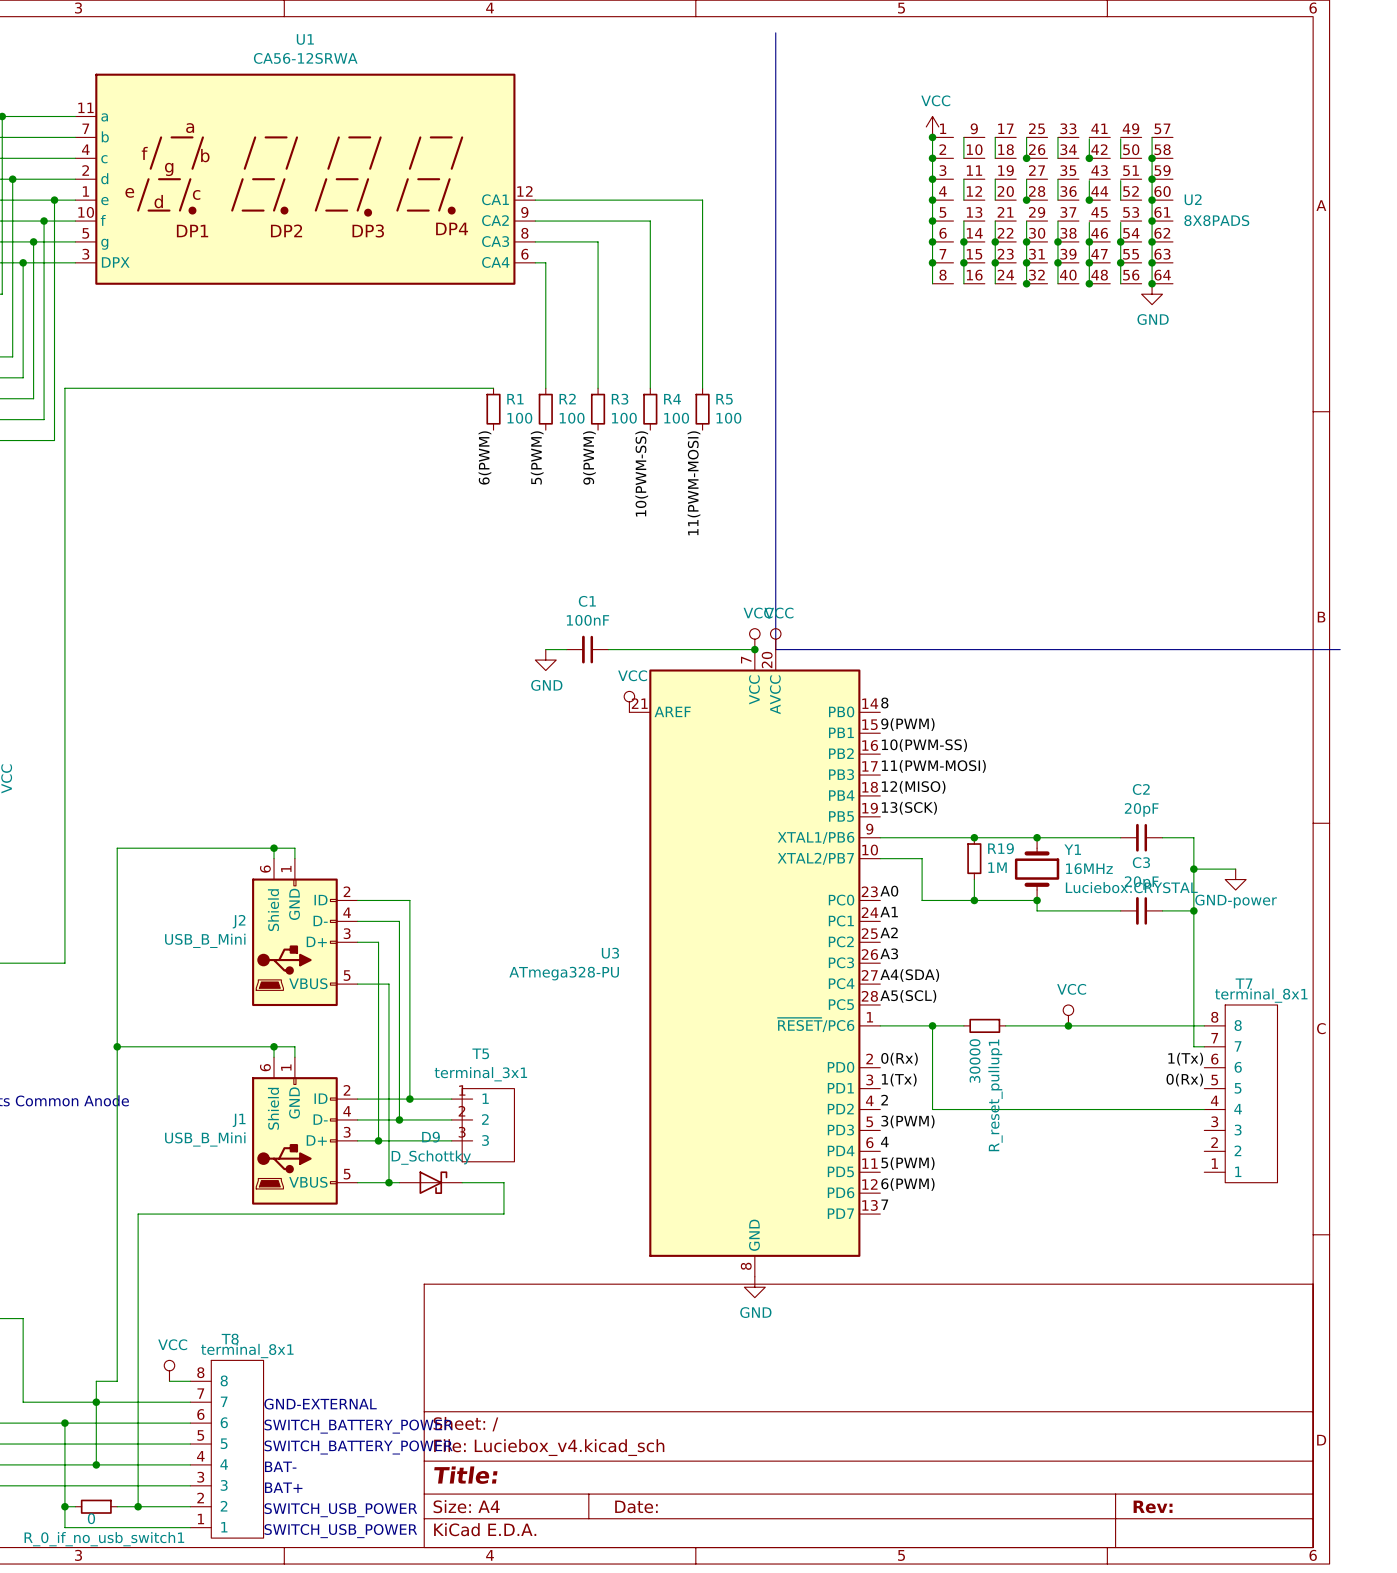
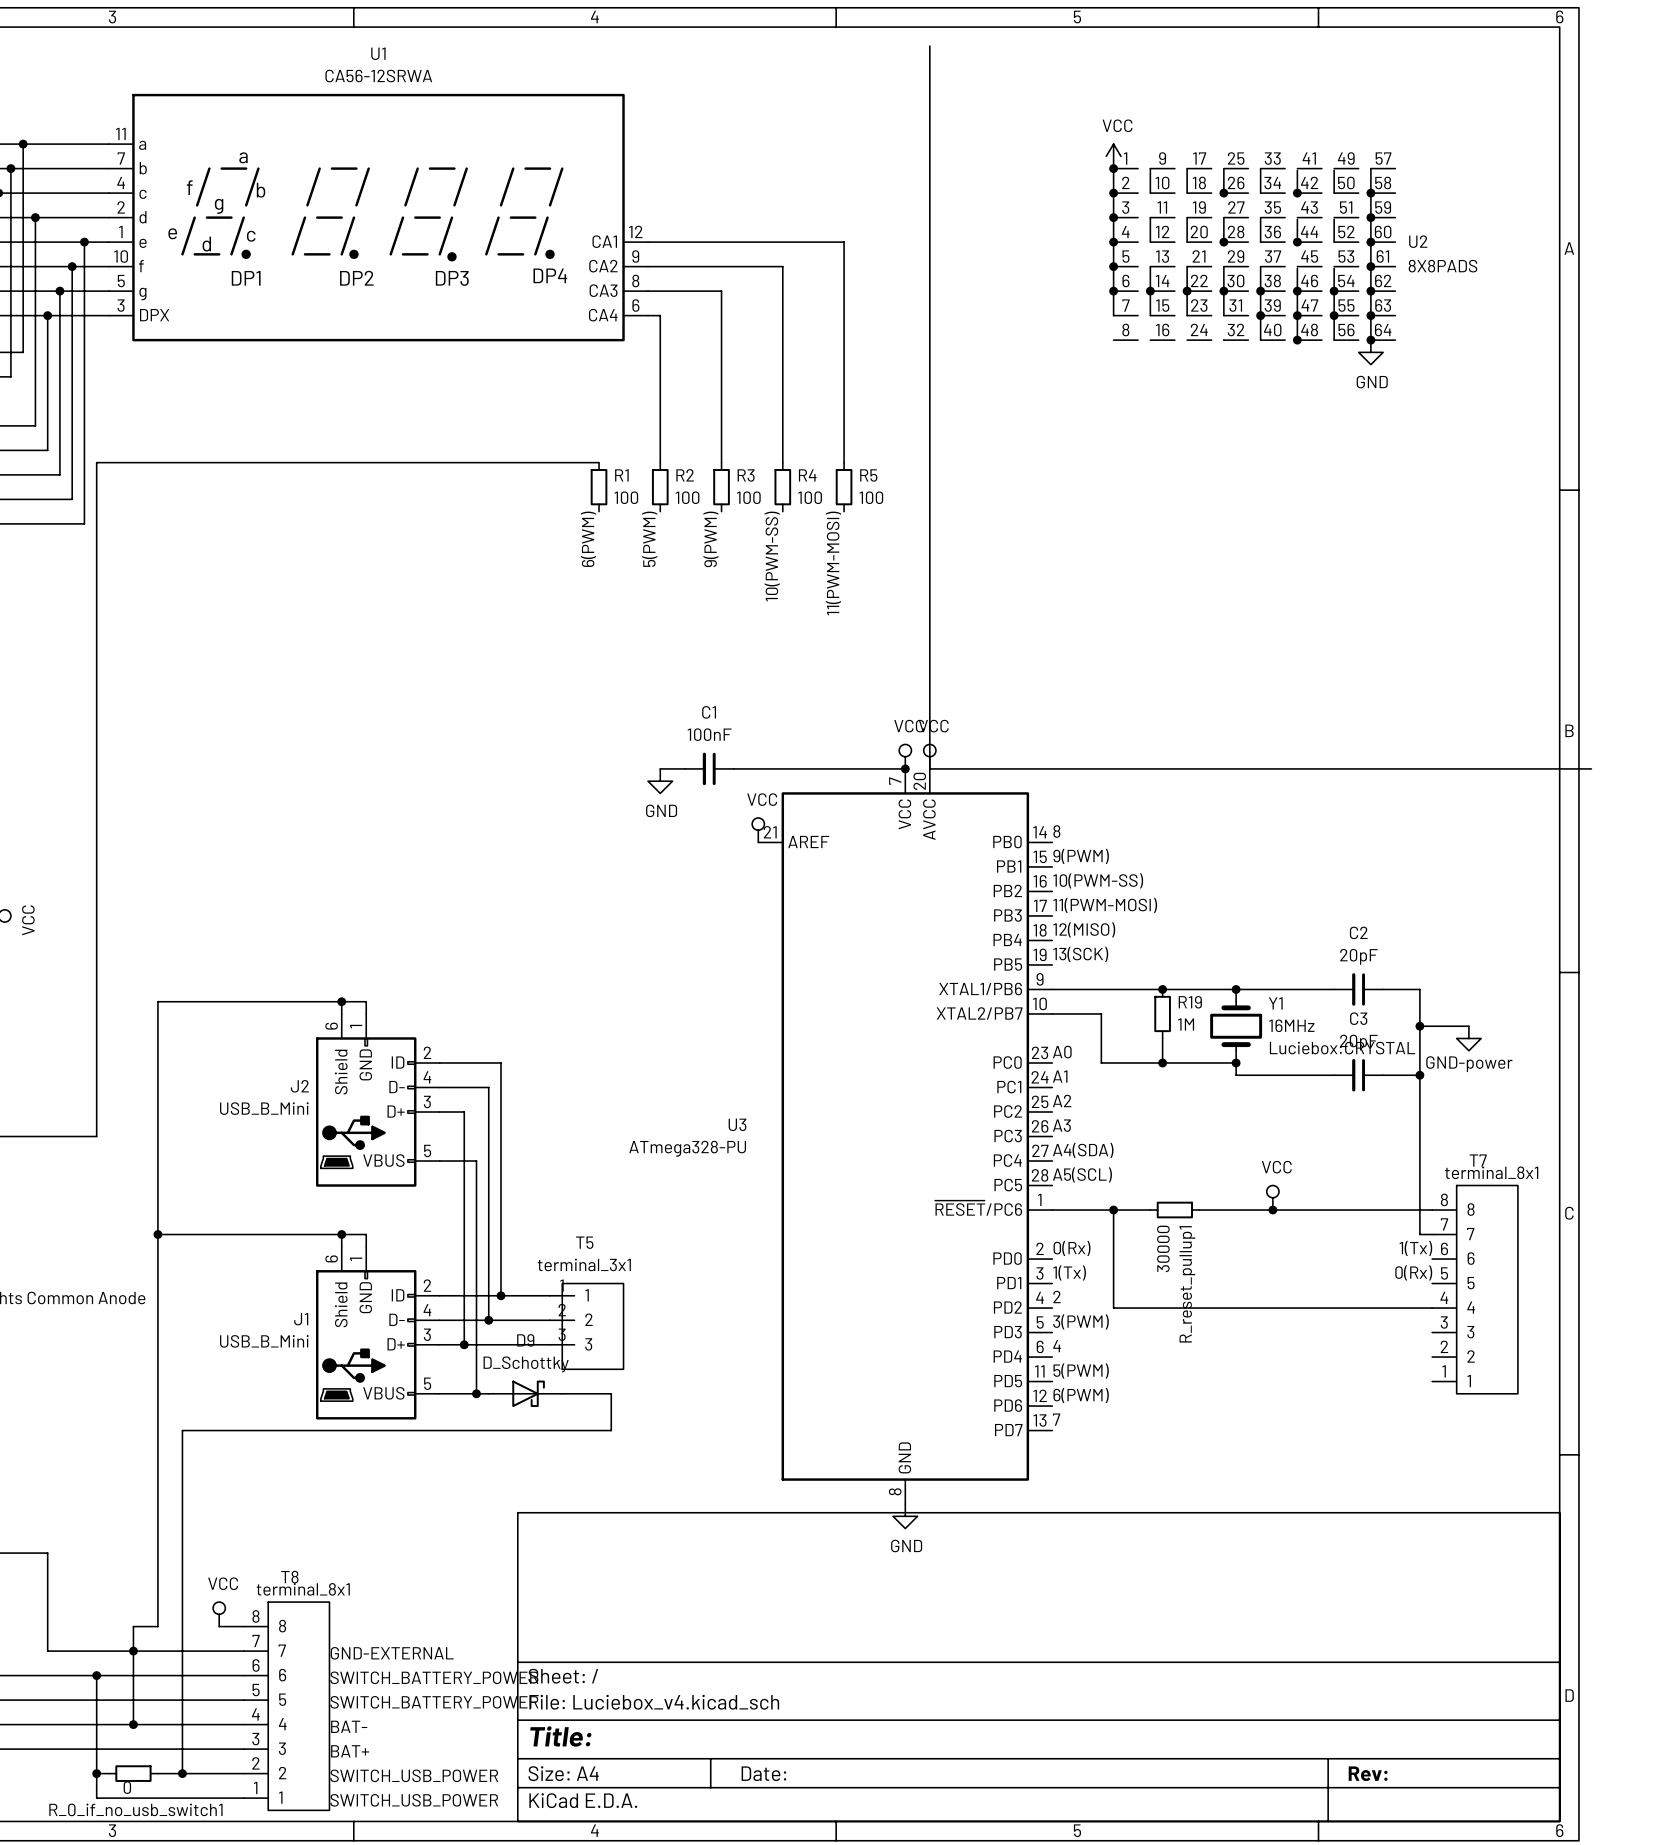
wire: (932, 262) (932, 283) -> none
junction: (932, 262) -> none
wire: (963, 262) (963, 283) -> none
junction: (963, 262) -> none
wire: (995, 262) (995, 283) -> none
junction: (995, 262) -> none
wire: (1026, 262) (1026, 283) -> none
junction: (1026, 262) -> none
junction: (1026, 283) -> none

